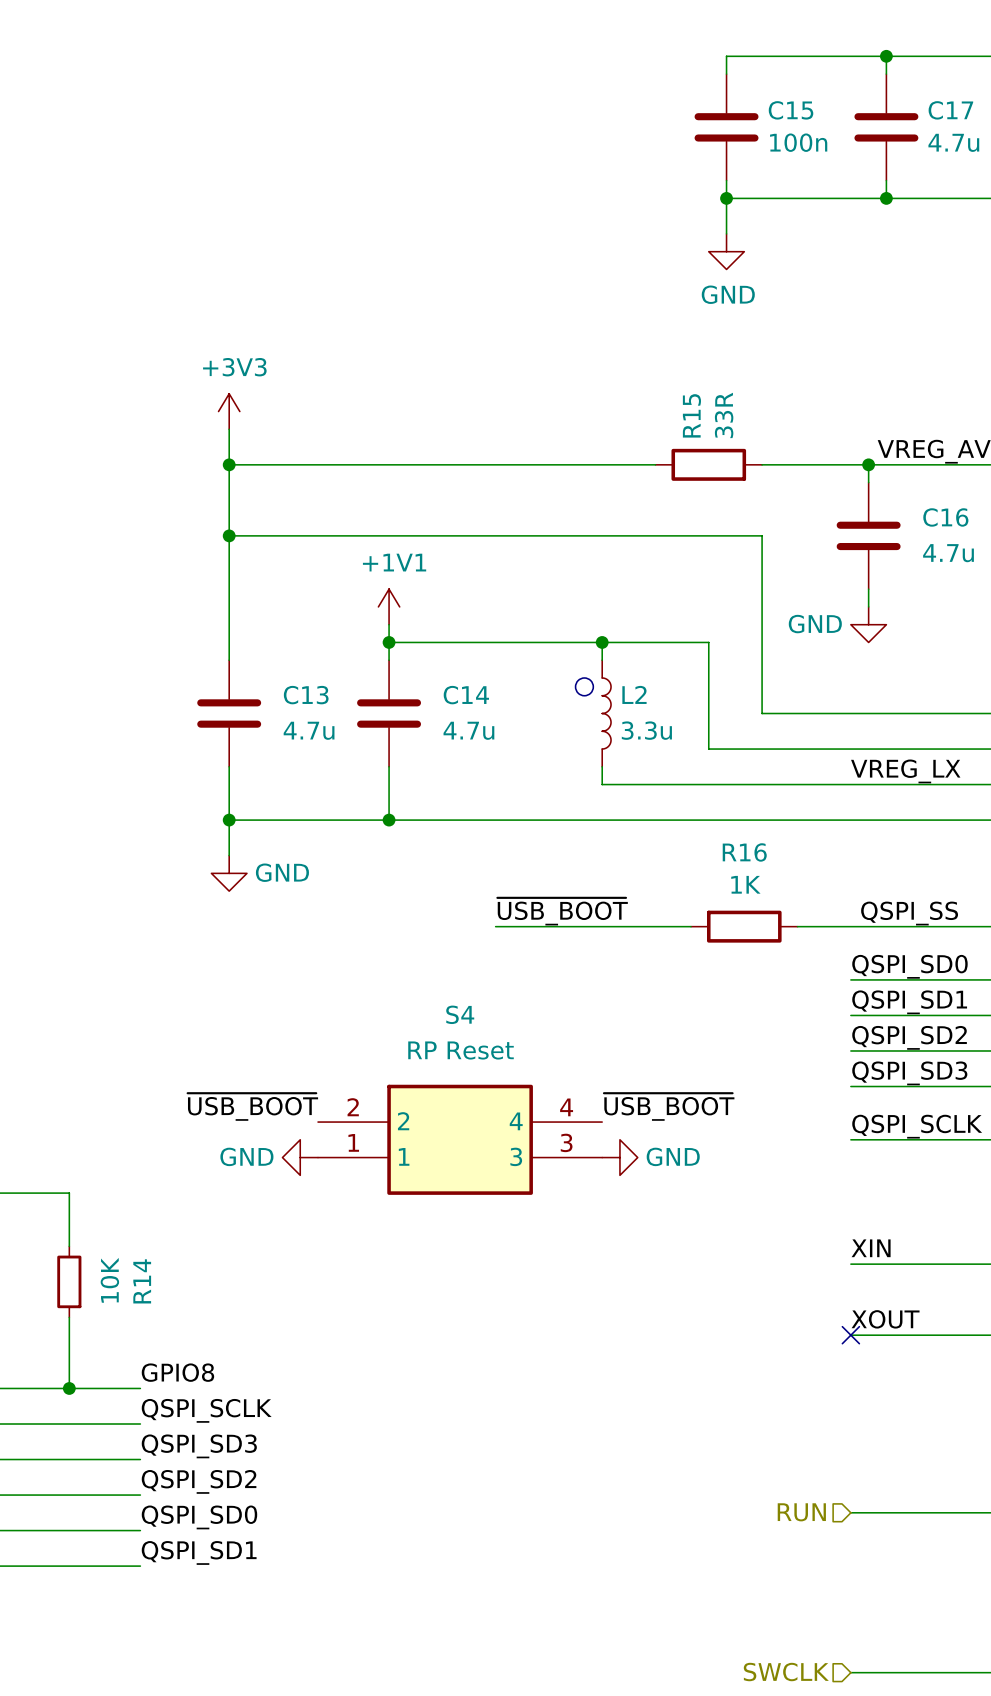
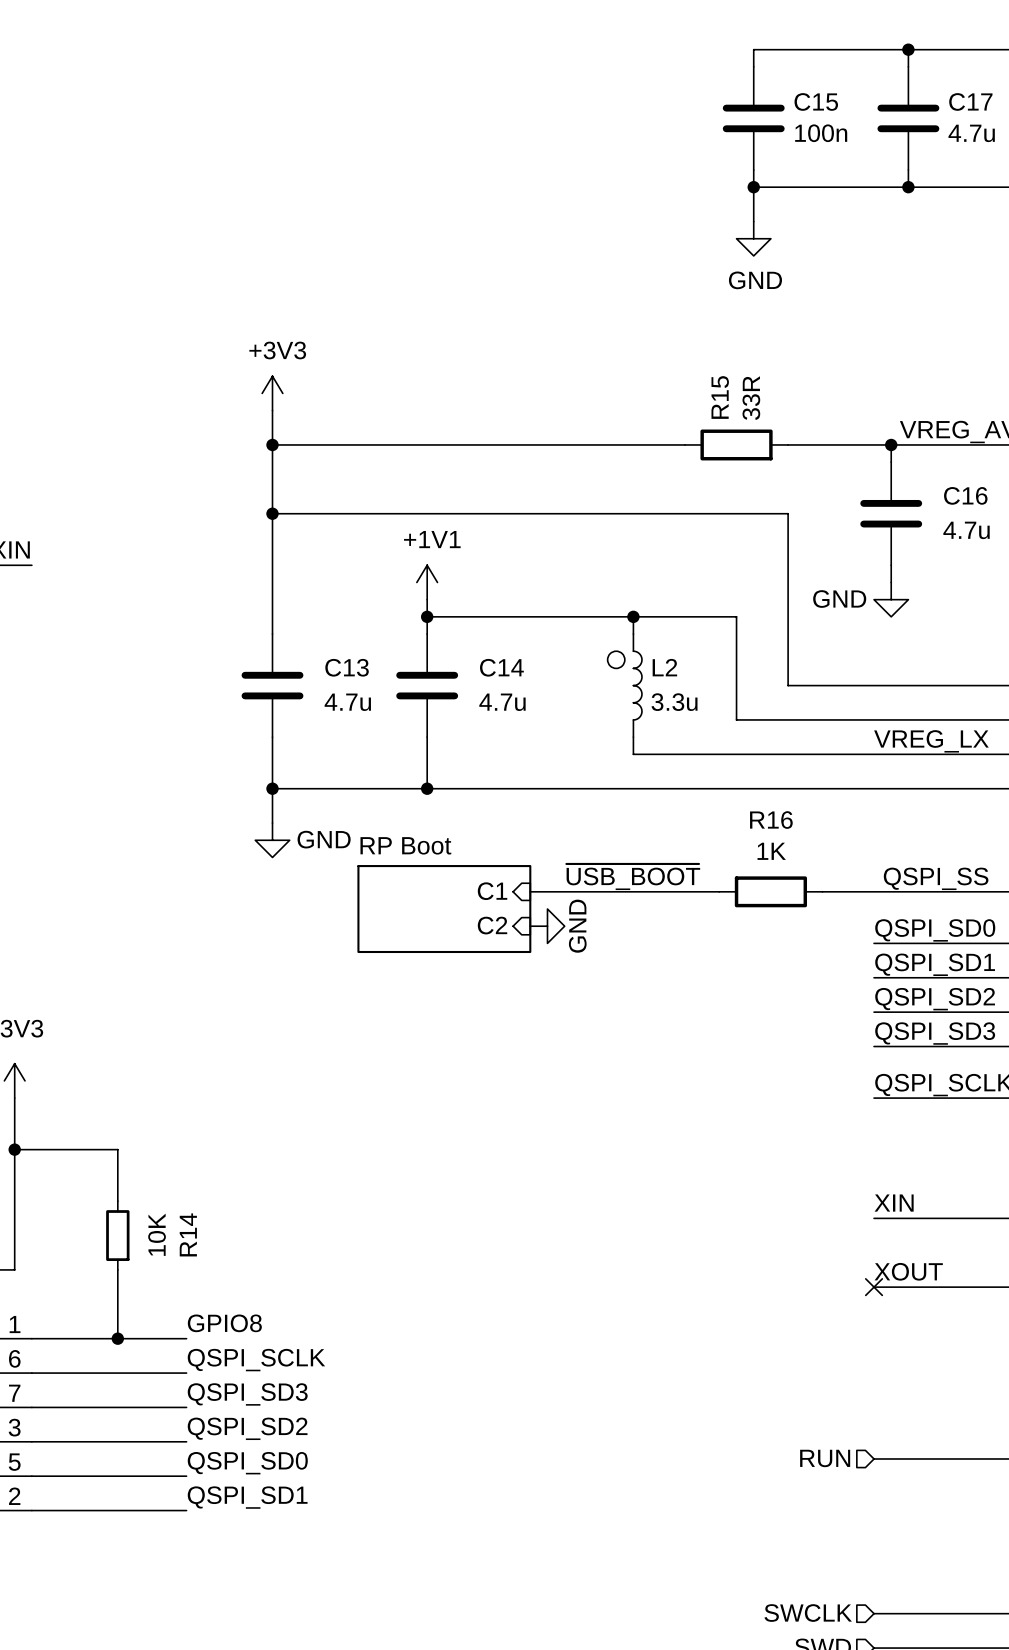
label position: ~{USB_BOOT} (562, 911) -> ~{USB_BOOT} (633, 877)
sheet pin: none -> C1 (492, 891)
sheet RP Boot: none -> (444, 909)
sheet pin: none -> C2 (492, 925)
power symbol: none -> GND (547, 926)
label: ~{USB_BOOT} (252, 1107) -> none
label: ~{USB_BOOT} (669, 1107) -> none
S4: RP Reset (460, 1139) -> none
power symbol: GND (300, 1157) -> none
power symbol: GND (619, 1157) -> none

